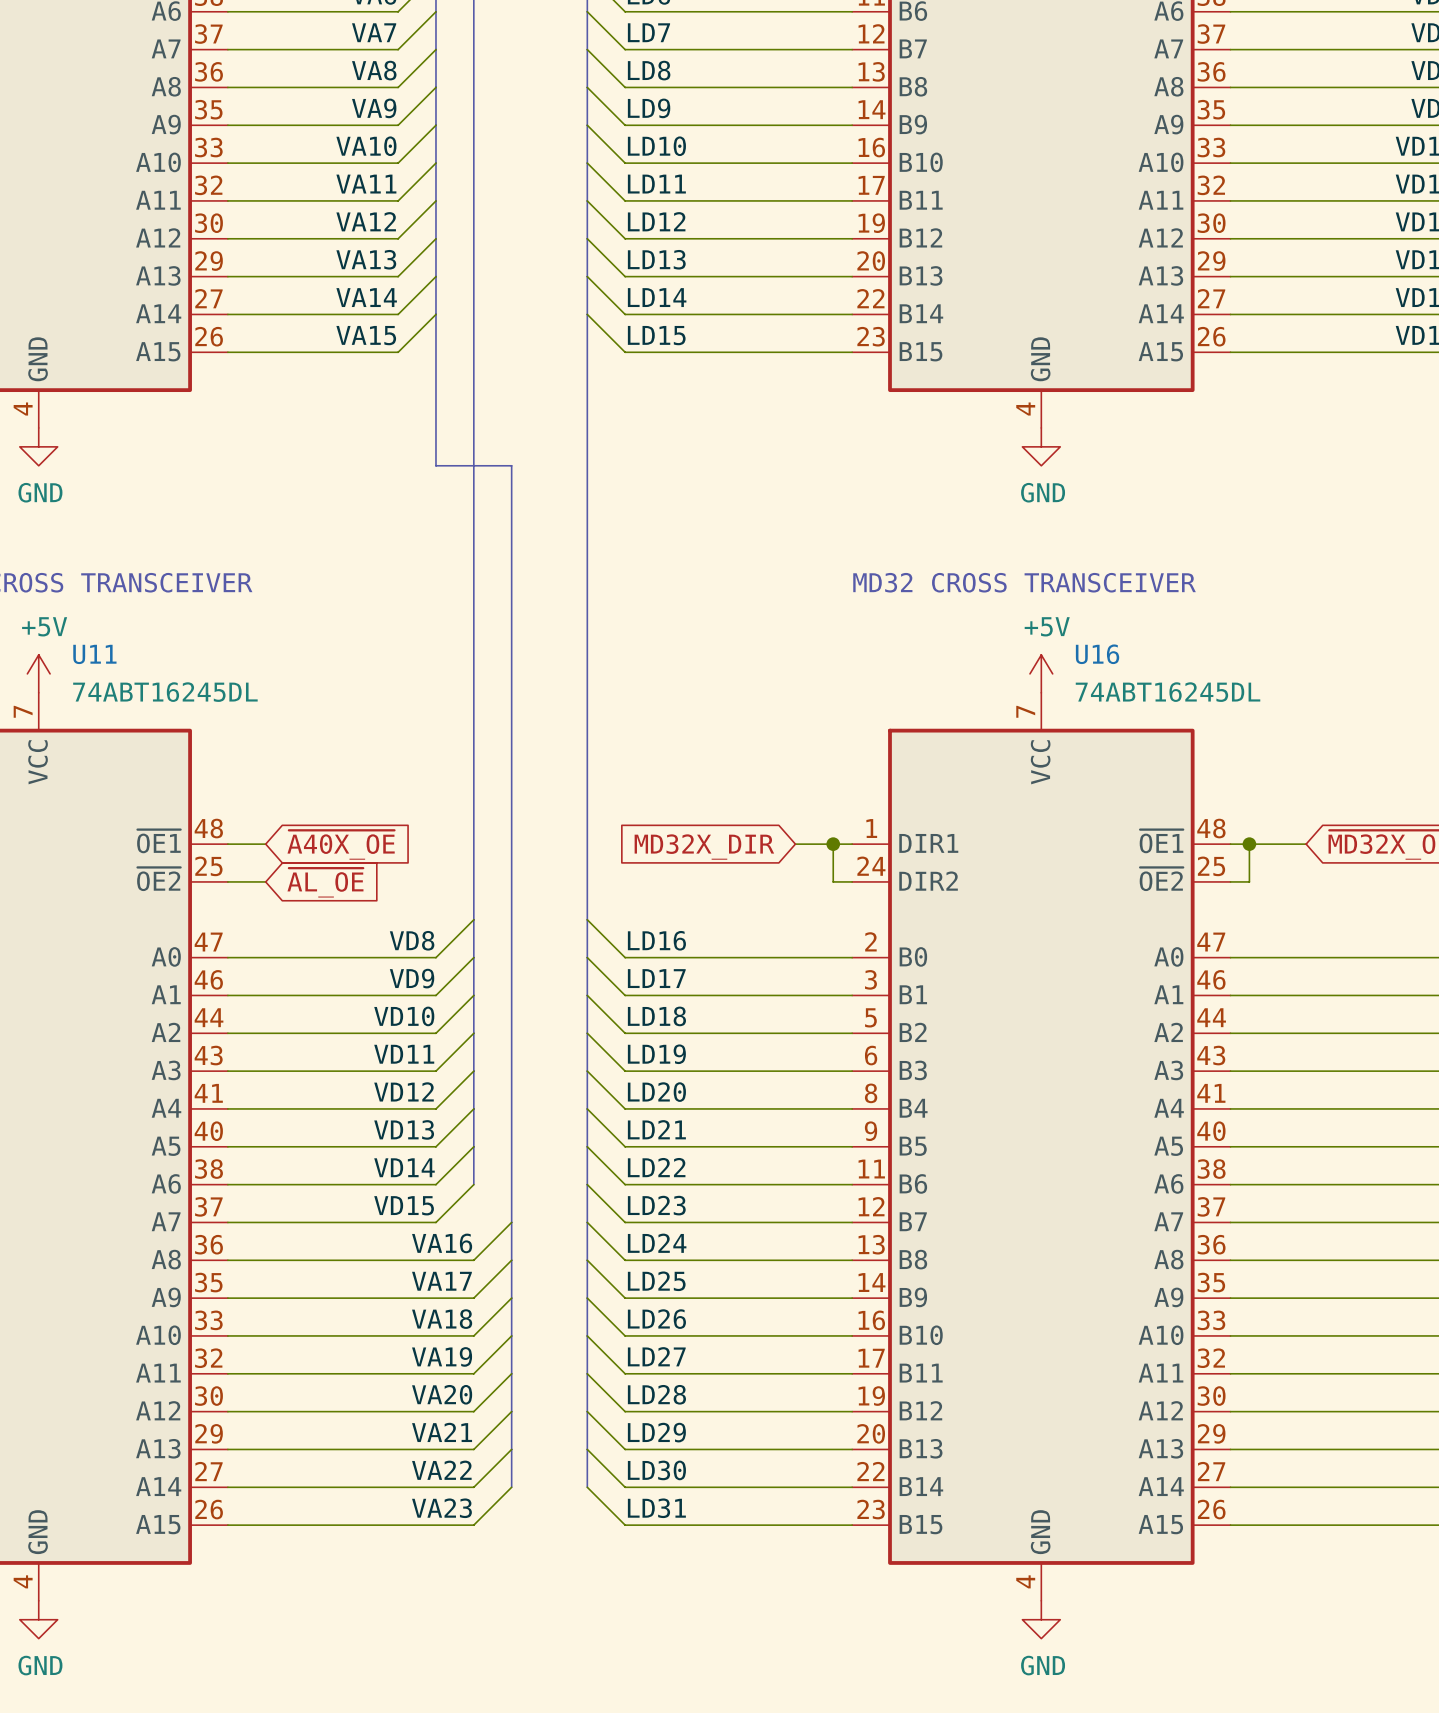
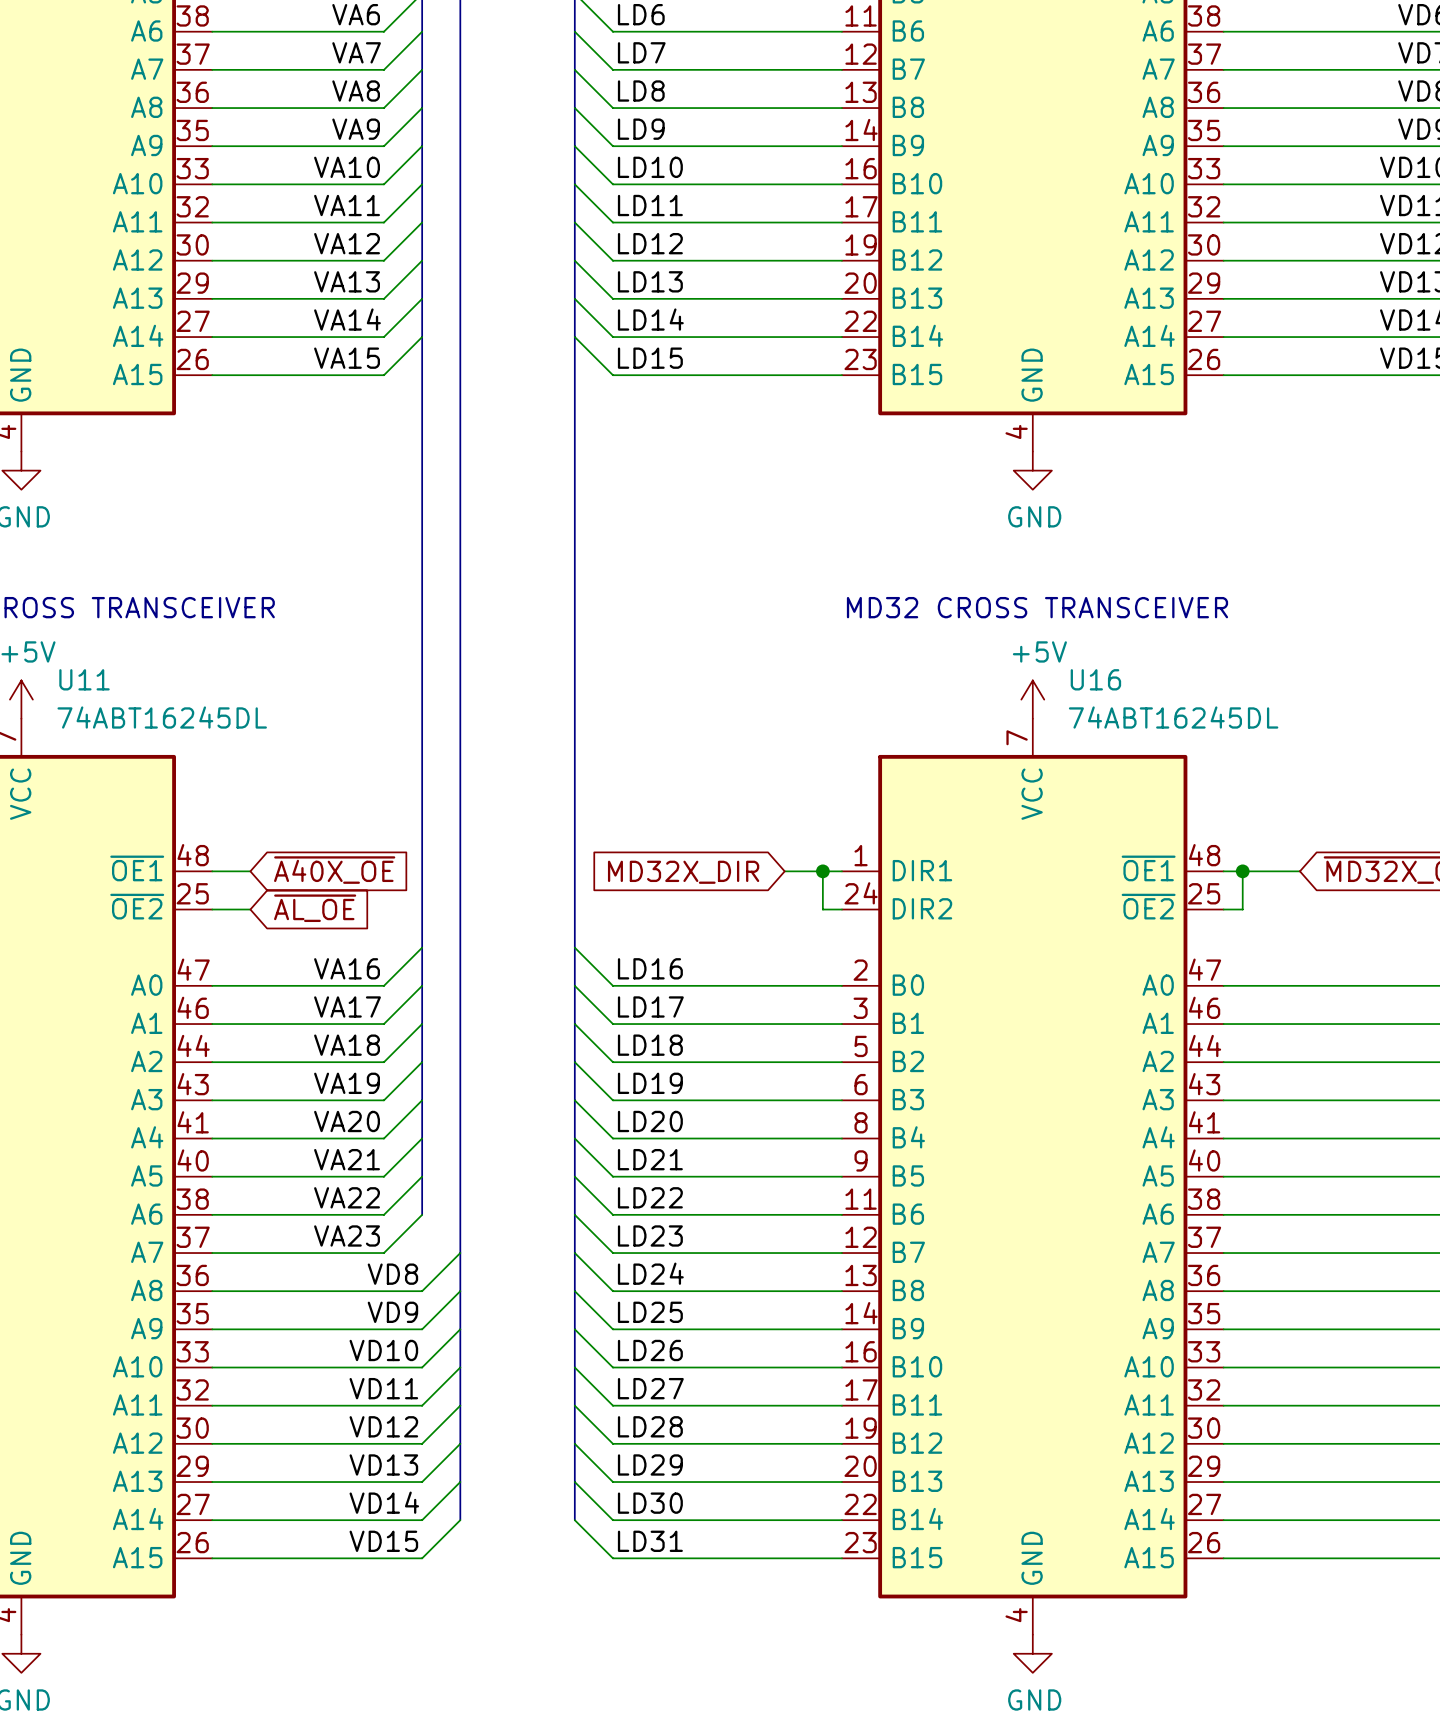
bus: (435, 465) (511, 465) (511, 1487) -> (422, 489) (422, 1214)
wire: (473, 919) (435, 957) (398, 957) -> (422, 947) (383, 985)
label position: VD8 (412, 940) -> VD8 (392, 1274)
wire: (473, 957) (435, 995) (398, 995) -> (422, 985) (383, 1024)
label position: VD9 (412, 978) -> VD9 (392, 1312)
wire: (473, 995) (435, 1033) (398, 1033) -> (422, 1024) (383, 1062)
label position: VD10 (404, 1016) -> VD10 (383, 1350)
wire: (473, 1033) (435, 1071) (398, 1071) -> (422, 1062) (383, 1100)
label position: VD11 (404, 1054) -> VD11 (383, 1388)
wire: (473, 1071) (435, 1108) (398, 1108) -> (422, 1100) (383, 1138)
label position: VD12 (404, 1091) -> VD12 (383, 1426)
wire: (473, 1108) (435, 1146) (398, 1146) -> (422, 1138) (383, 1176)
label position: VD13 (404, 1129) -> VD13 (383, 1464)
wire: (473, 1146) (435, 1184) (398, 1184) -> (422, 1176) (383, 1214)
label position: VD14 (404, 1167) -> VD14 (384, 1502)
wire: (473, 1184) (435, 1222) (398, 1222) -> (422, 1214) (383, 1253)
bus: none -> (460, 1214) (460, 1520)
label position: VD15 (404, 1205) -> VD15 (383, 1541)
wire: (511, 1222) (473, 1260) (435, 1260) -> (460, 1253) (422, 1291)
label position: VA16 (442, 1243) -> VA16 (347, 968)
wire: (511, 1260) (473, 1298) (435, 1298) -> (460, 1291) (422, 1329)
label position: VA17 (441, 1281) -> VA17 (347, 1006)
wire: (511, 1298) (473, 1335) (435, 1335) -> (460, 1329) (422, 1367)
label position: VA18 (442, 1319) -> VA18 (347, 1045)
wire: (511, 1335) (473, 1373) (435, 1373) -> (460, 1367) (422, 1405)
label position: VA19 (442, 1356) -> VA19 (347, 1083)
wire: (511, 1373) (473, 1411) (435, 1411) -> (460, 1405) (422, 1443)
label position: VA20 (442, 1394) -> VA20 (347, 1121)
wire: (511, 1411) (473, 1449) (435, 1449) -> (460, 1443) (422, 1482)
label position: VA21 (442, 1432) -> VA21 (347, 1159)
wire: (511, 1449) (473, 1487) (435, 1487) -> (460, 1482) (422, 1520)
label position: VA22 (441, 1470) -> VA22 (347, 1197)
wire: (511, 1487) (473, 1525) (435, 1525) -> (460, 1520) (422, 1558)
label position: VA23 (441, 1508) -> VA23 (347, 1235)

